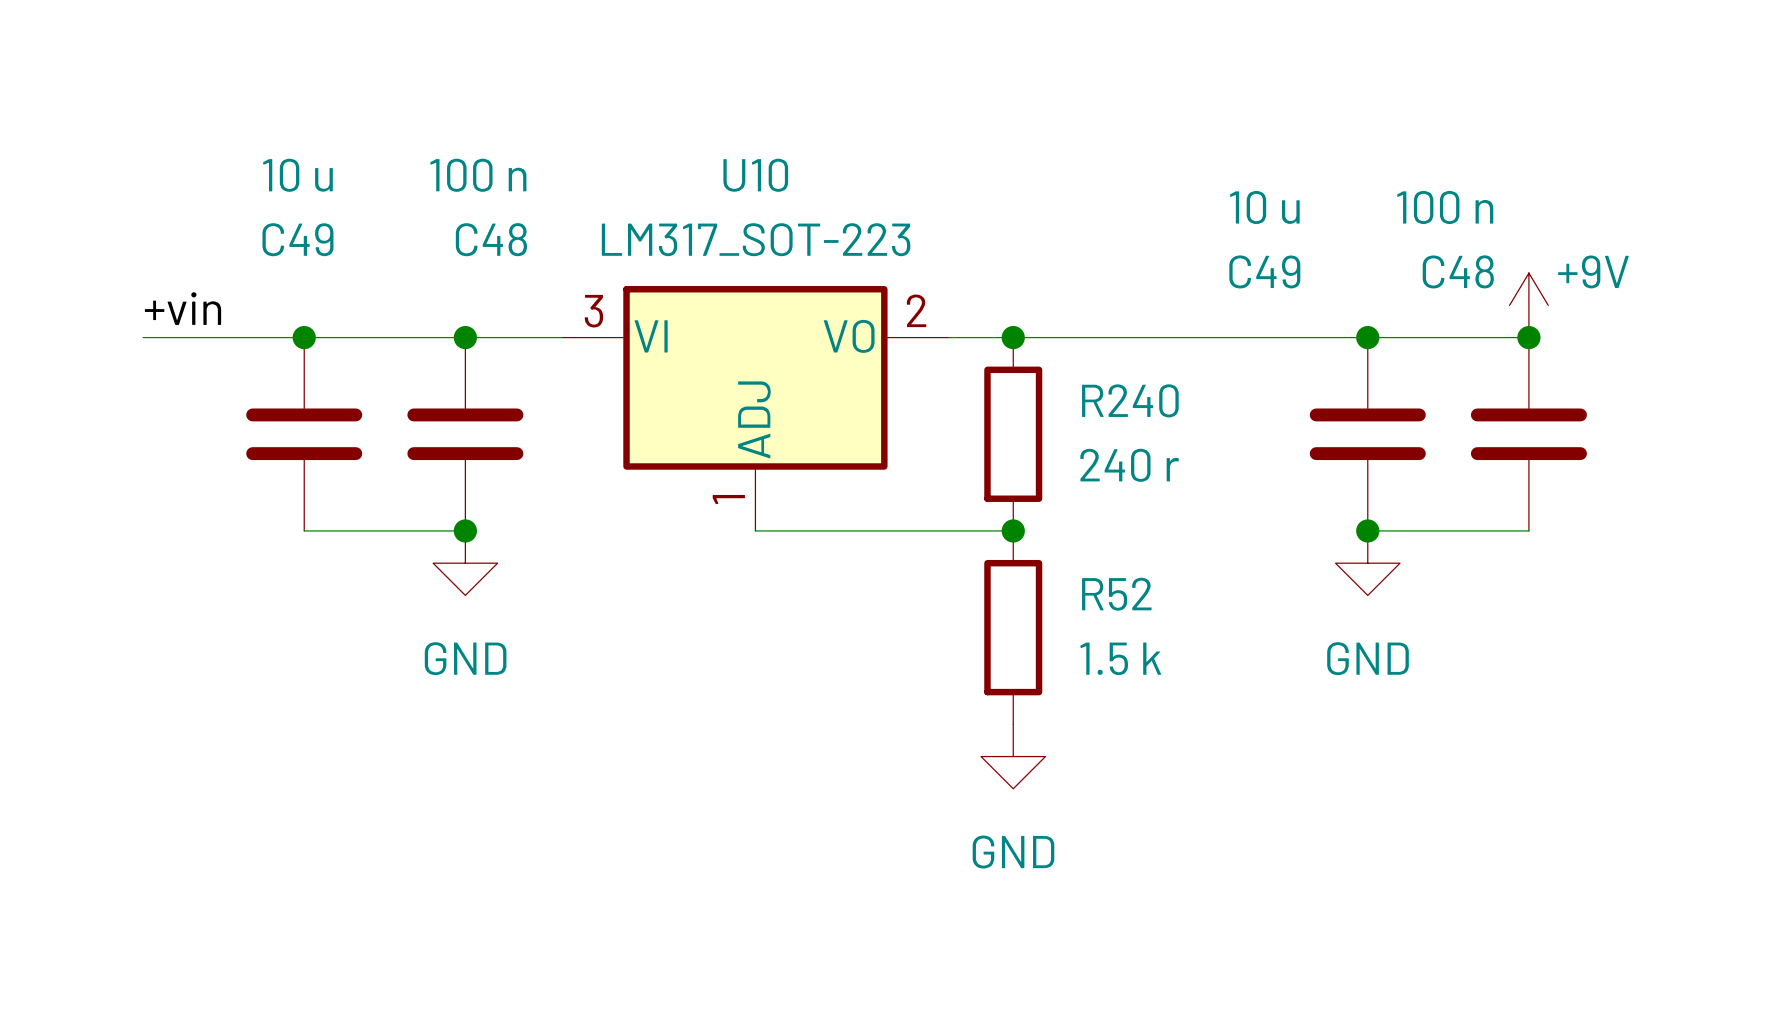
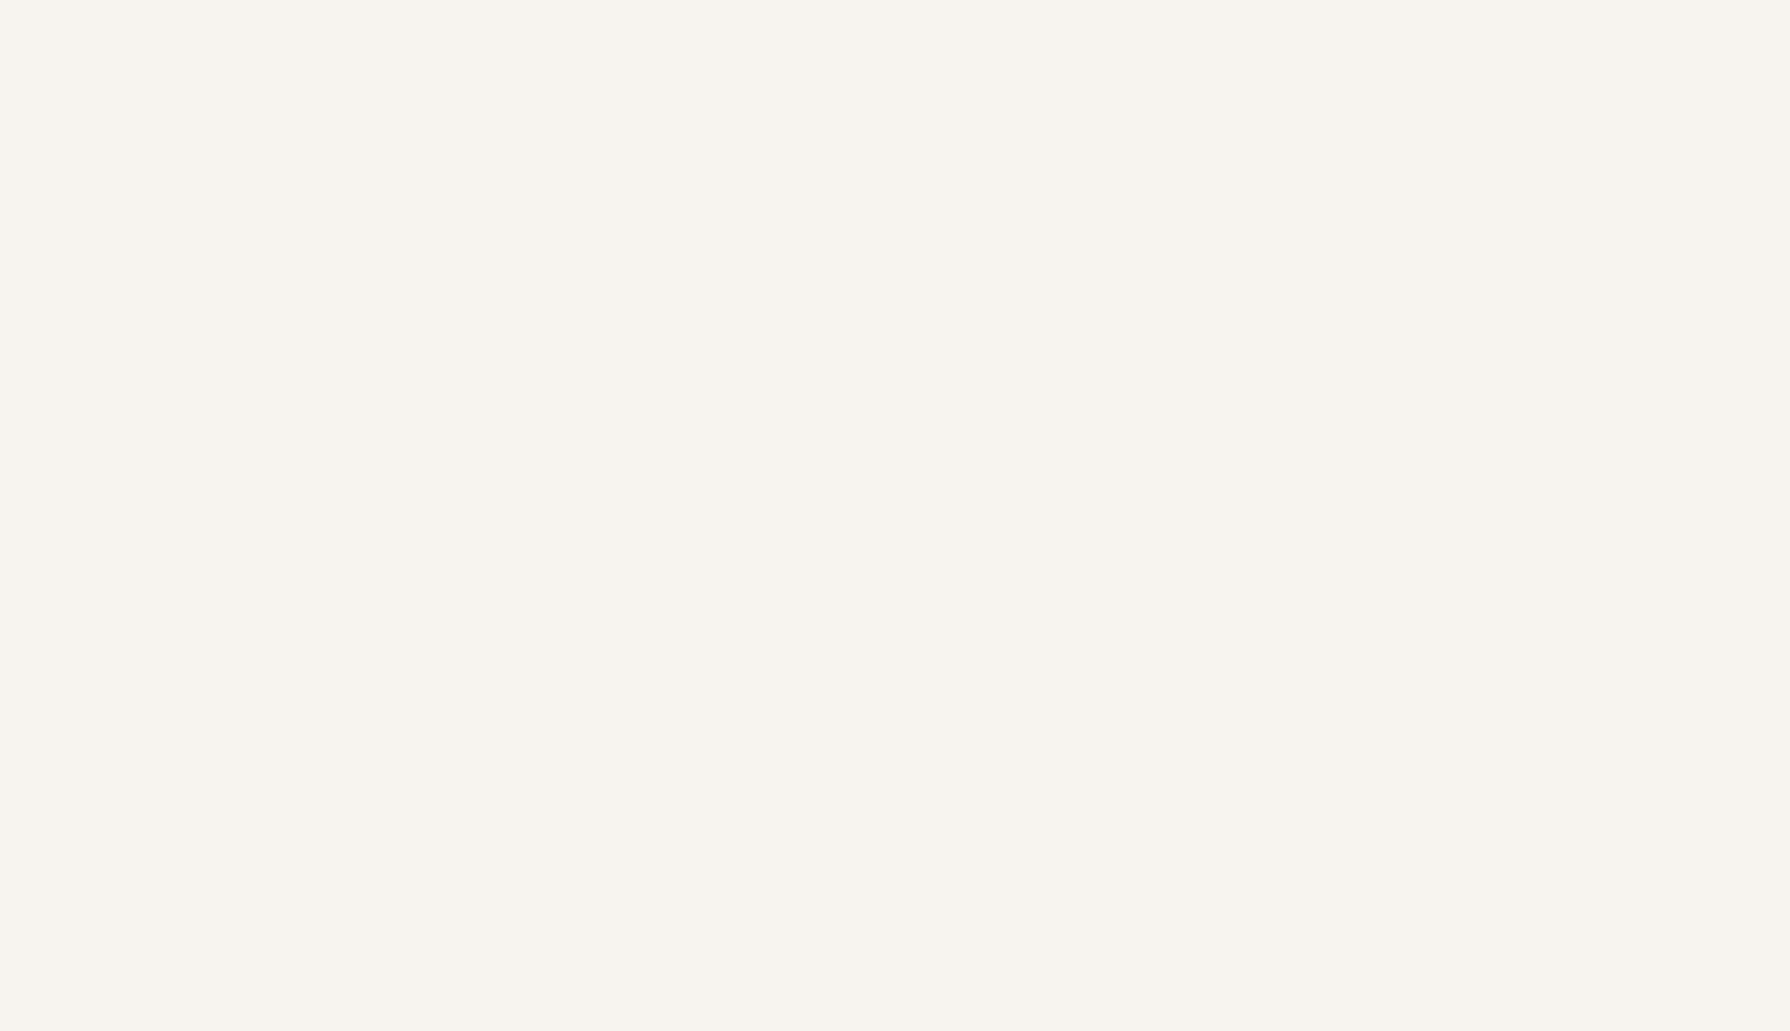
power symbol: +9V (1528, 305) -> none
label: +vin (183, 308) -> none
wire: (143, 337) (562, 337) -> none
junction: (304, 337) -> none
junction: (465, 337) -> none
wire: (948, 337) (1528, 337) -> none
junction: (1013, 337) -> none
junction: (1367, 337) -> none
junction: (1528, 337) -> none
U10: LM317_SOT-223 (755, 408) -> none
C49: 10 u (304, 434) -> none
C48: 100 n (465, 434) -> none
R240: 240 r (1013, 434) -> none
C49: 10 u (1367, 434) -> none
C48: 100 n (1528, 434) -> none
wire: (304, 530) (465, 530) -> none
junction: (465, 530) -> none
wire: (755, 530) (1013, 530) -> none
junction: (1013, 530) -> none
wire: (1367, 530) (1528, 530) -> none
junction: (1367, 530) -> none
power symbol: GND (465, 563) -> none
power symbol: GND (1367, 563) -> none
R52: 1.5 k (1013, 627) -> none
power symbol: GND (1013, 756) -> none

